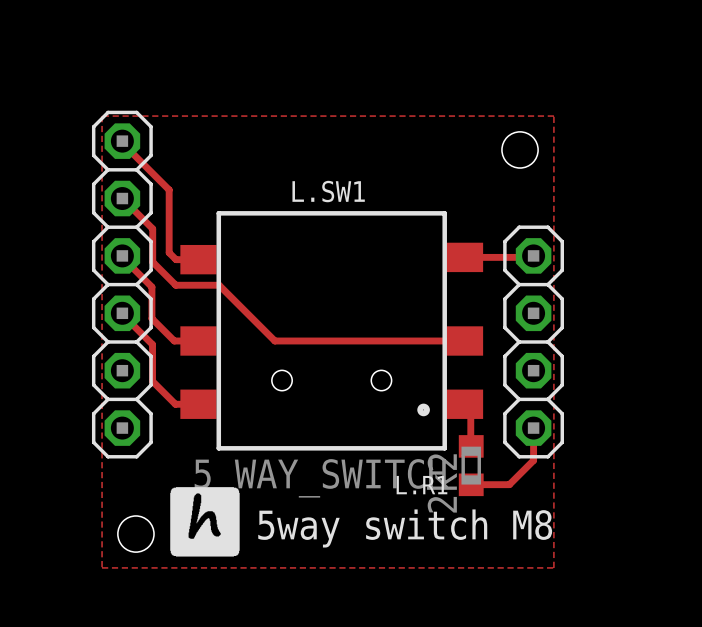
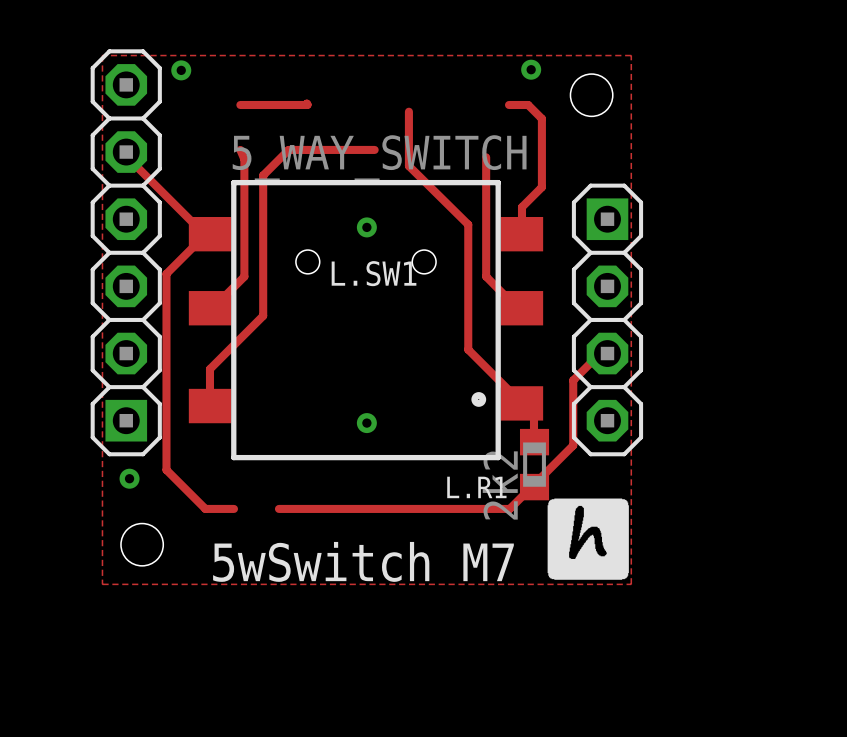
part footprint: [91, 110, 153, 459] -> [90, 49, 162, 457]
via: none -> (181, 70)
via: none -> (531, 69)
track: (122, 141) (169, 189) (169, 252) (176, 259) (198, 259) -> none
track: none -> (307, 104) (240, 104)
track: none -> (509, 104) (528, 104) (541, 118) (541, 187) (521, 207) (521, 234)
track: none -> (408, 111) (408, 166) (468, 224) (468, 349) (521, 403)
L.SW1 name position: L.SW1 (328, 191) -> L.SW1 (374, 273)
track: none -> (240, 149) (244, 159) (244, 276) (212, 308) (209, 308)
track: none -> (374, 149) (288, 149) (263, 175) (263, 315) (209, 369) (209, 406)
track: (122, 198) (152, 228) (152, 262) (175, 285) (219, 285) (274, 340) (465, 340) -> (126, 152) (126, 156) (204, 234) (209, 234)
track: none -> (486, 157) (486, 276) (517, 308) (521, 308)
part footprint: [503, 225, 565, 459] -> [571, 183, 644, 457]
track: (122, 255) (151, 287) (151, 318) (174, 340) (198, 340) -> none
track: (533, 255) (465, 257) -> none
via: none -> (366, 227)
track: none -> (205, 234) (166, 273) (166, 469) (205, 508) (234, 508)
track: (122, 313) (152, 344) (152, 381) (175, 404) (198, 404) -> none
L.SW1 rotation: 0° (331, 330) -> 180° (365, 320)
track: none -> (607, 353) (600, 353) (573, 380) (573, 445) (509, 508) (278, 508)
track: (533, 428) (533, 460) (509, 484) (471, 484) -> none
via: none -> (366, 423)
via: none -> (129, 478)
drawing: [170, 487, 240, 557] -> none
drawing: none -> [547, 498, 629, 580]
text: 5way switch M8 (405, 528) -> 5wSwitch M7 (363, 561)

